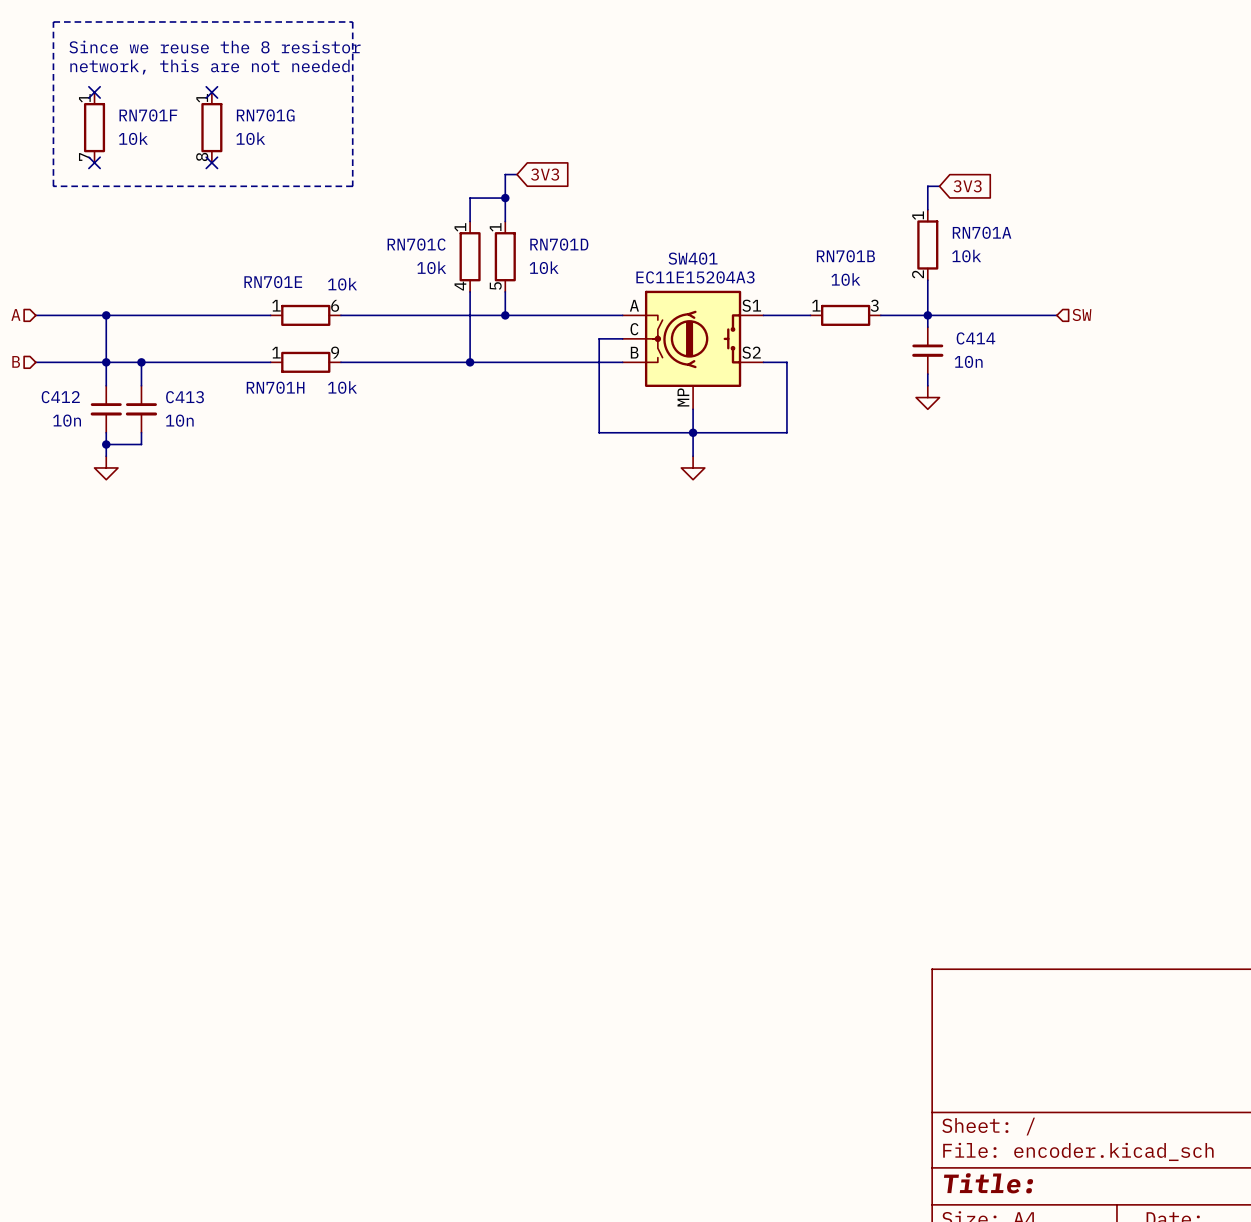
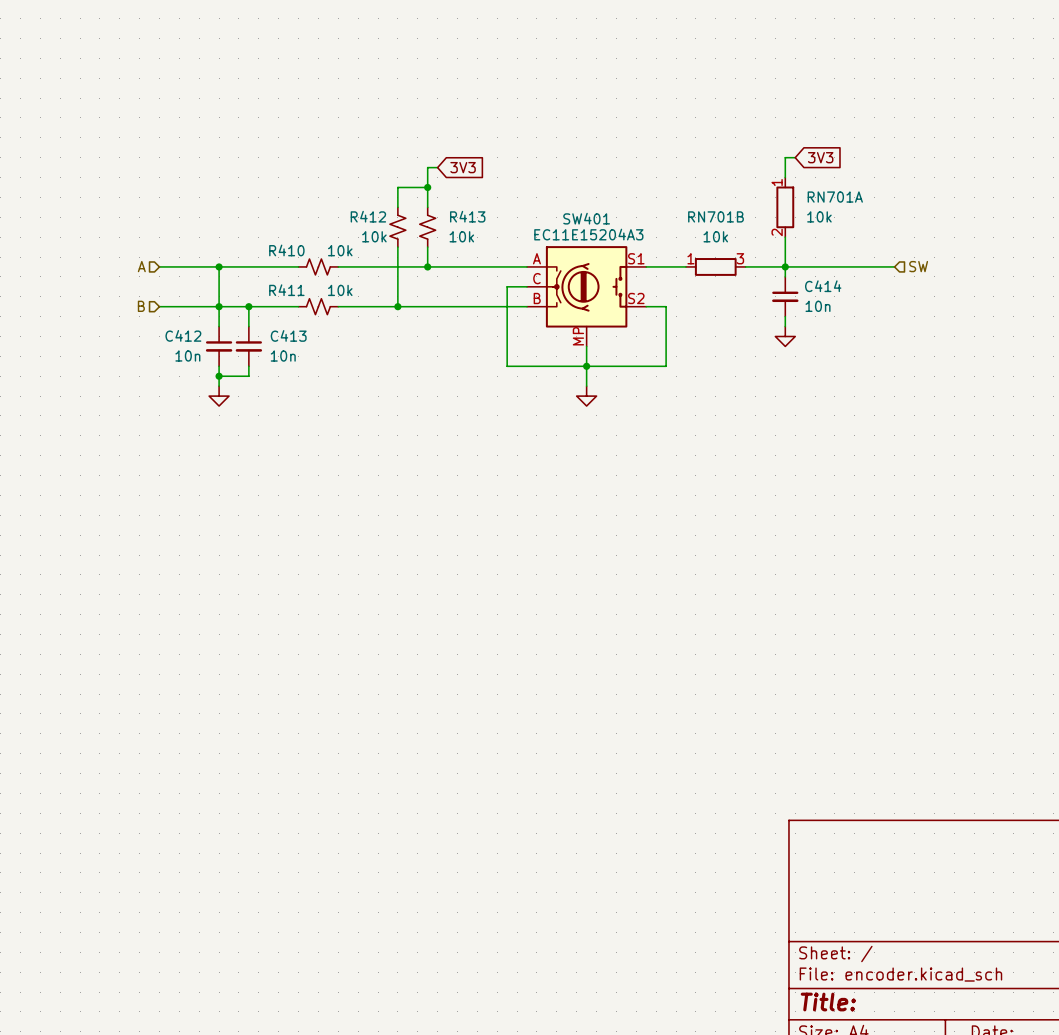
line: (53, 21) (352, 21) (352, 186) (53, 186) (53, 21) -> none
text: Since we reuse the 8 resistor (215, 47) -> none
text: network, this are not needed (209, 67) -> none
no-connect mark: (94, 92) -> none
no-connect mark: (211, 92) -> none
RN701F: 10k (94, 127) -> none
RN701G: 10k (211, 127) -> none
no-connect mark: (94, 162) -> none
no-connect mark: (211, 162) -> none
wire: (517, 174) (505, 174) (505, 198) (470, 198) (470, 221) -> none
global label position: 3V3 (545, 174) -> 3V3 (463, 167)
wire: none -> (427, 167) (437, 167)
junction position: (505, 198) -> (427, 187)
wire: none -> (397, 207) (397, 187) (427, 187) (427, 207)
RN701C: 10k (470, 256) -> none
RN701D: 10k (505, 256) -> none
R412: none -> 10k (397, 227)
R413: none -> 10k (427, 227)
hierarchical label position: A (15, 314) -> A (141, 266)
wire: (35, 315) (188, 315) -> none
wire: (106, 315) (106, 385) -> (219, 266) (219, 326)
junction: (106, 315) -> none
junction: none -> (219, 266)
wire: none -> (229, 266) (288, 266)
RN701E: 10k (305, 315) -> none
R410: none -> 10k (318, 266)
hierarchical label position: B (16, 361) -> B (141, 306)
wire: (35, 362) (188, 362) -> none
junction: (106, 362) -> none
wire: (141, 362) (141, 385) -> (248, 306) (248, 326)
junction: (141, 362) -> none
junction: none -> (219, 306)
wire: none -> (229, 306) (288, 306)
junction: none -> (248, 306)
RN701H: 10k (305, 362) -> none
R411: none -> 10k (318, 306)
C412 position: (106, 409) -> (219, 346)
C413 position: (141, 409) -> (248, 346)
wire: (106, 432) (106, 456) -> (219, 366) (219, 386)
wire: (141, 432) (141, 444) (106, 444) -> (248, 366) (248, 376) (219, 376)
junction: (106, 444) -> none
junction: none -> (219, 376)
power symbol position: (106, 467) -> (219, 396)

